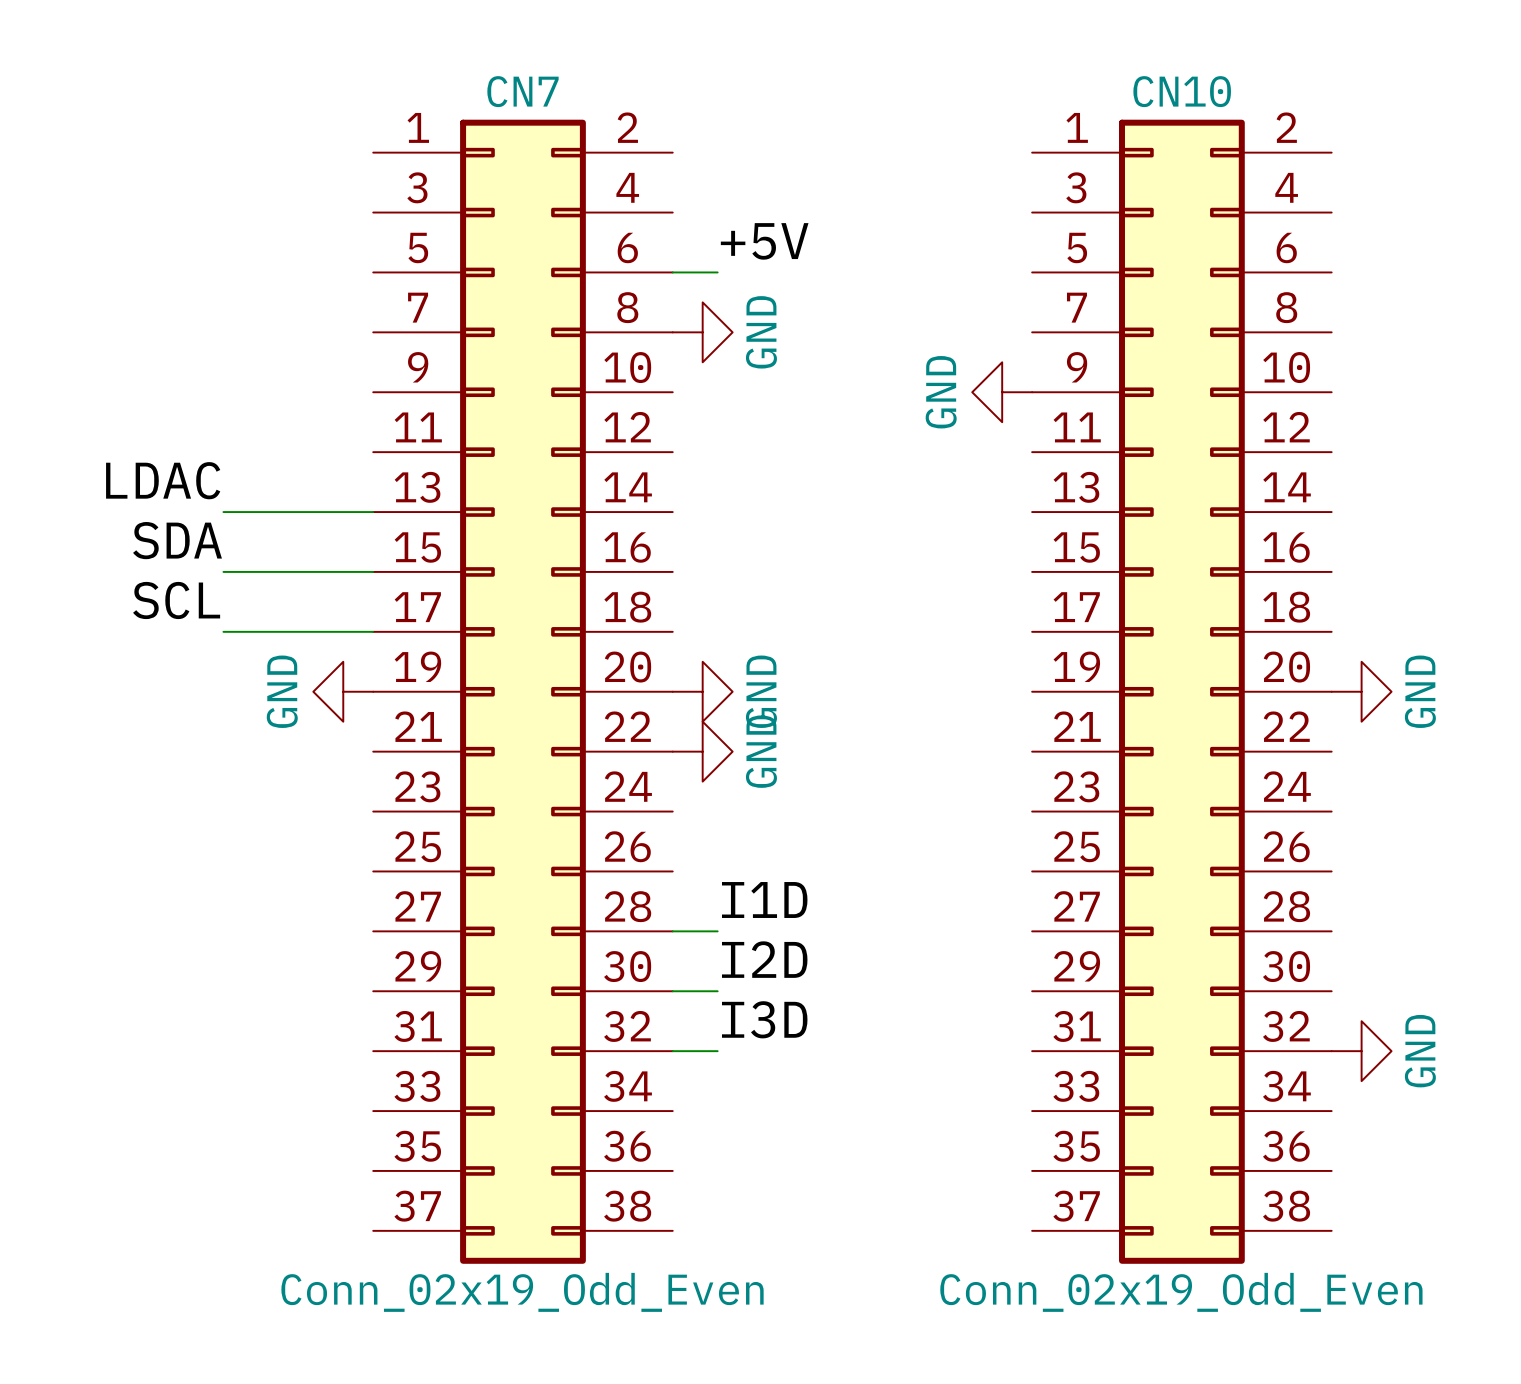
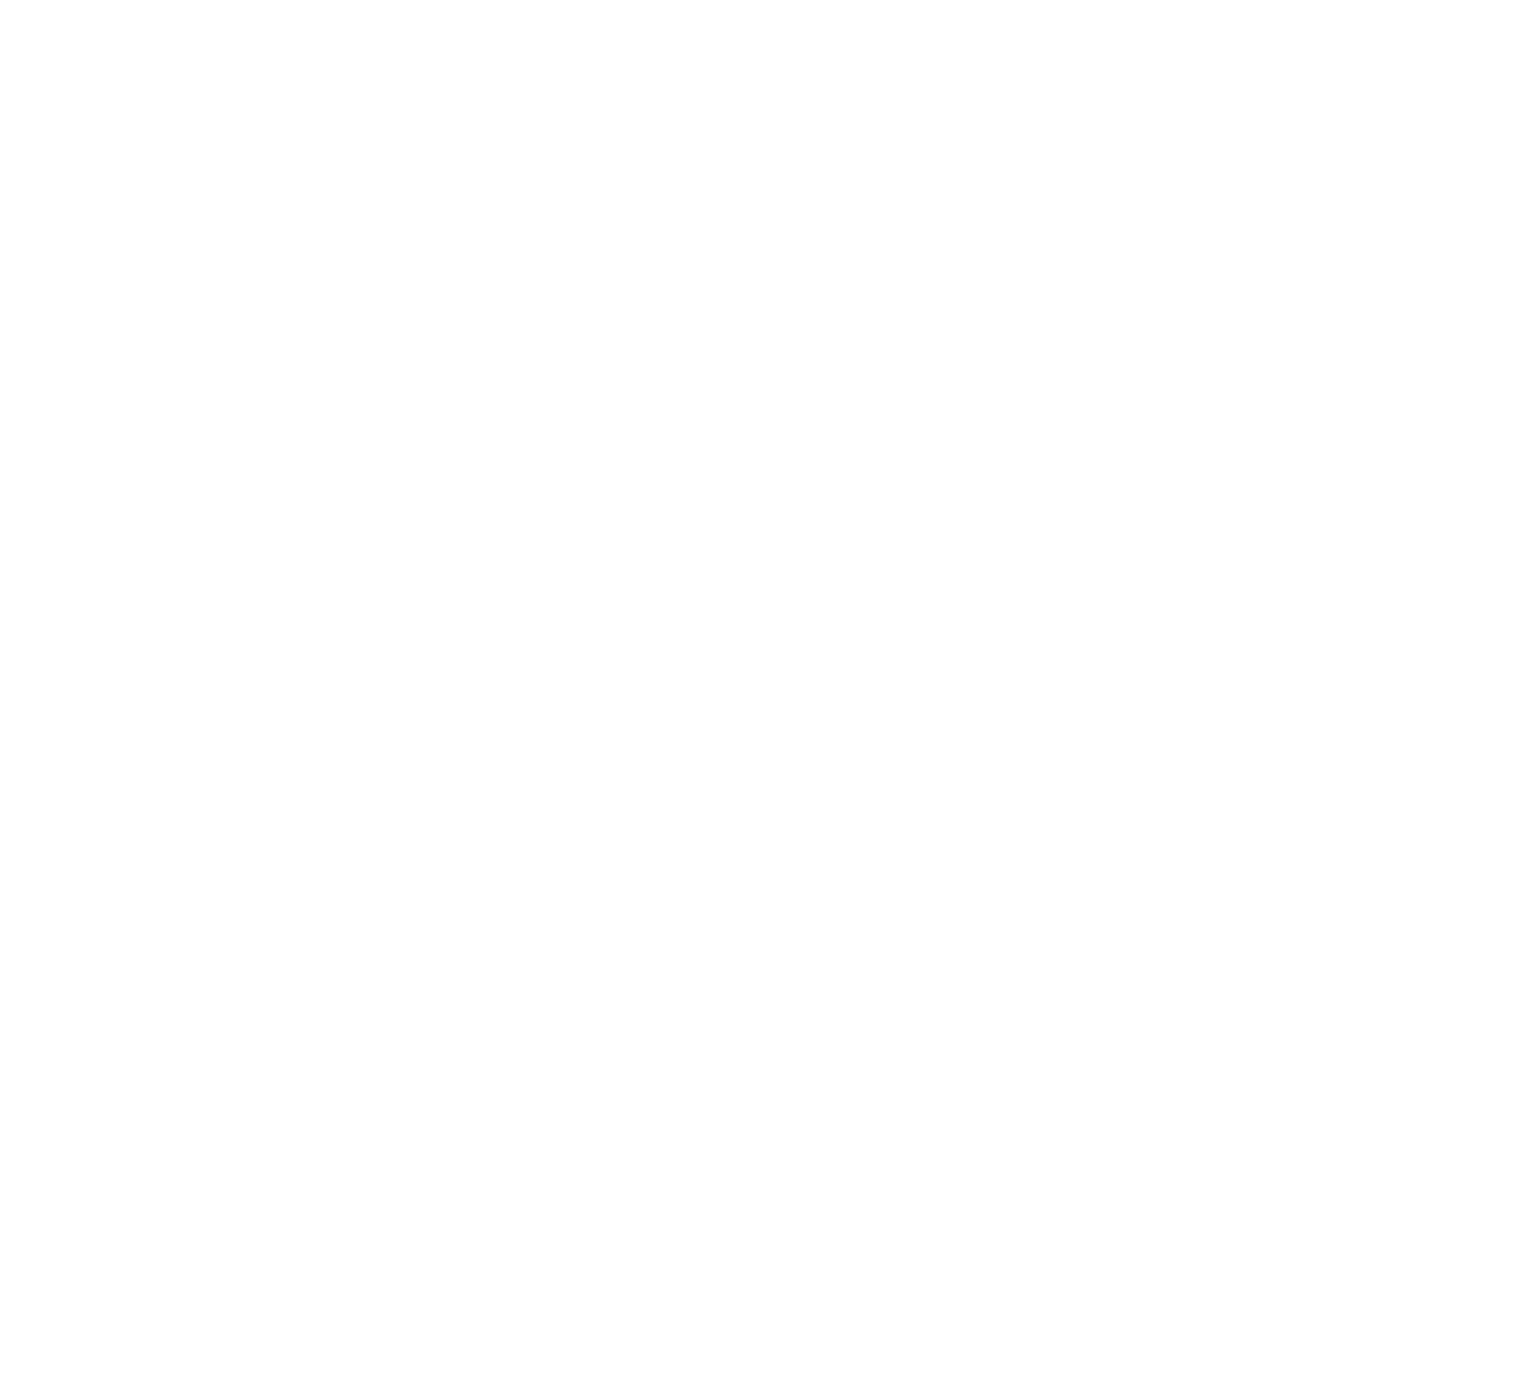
label: +5V (764, 241) -> none
wire: (672, 272) (717, 272) -> none
power symbol: GND (702, 332) -> none
power symbol: GND (1002, 392) -> none
label: LDAC (163, 480) -> none
wire: (223, 512) (373, 512) -> none
label: SDA (177, 540) -> none
wire: (223, 571) (373, 571) -> none
label: SCL (176, 600) -> none
wire: (223, 631) (373, 631) -> none
power symbol: GND (343, 691) -> none
CN7: Conn_02x19_Odd_Even (522, 691) -> none
power symbol: GND (702, 691) -> none
CN10: Conn_02x19_Odd_Even (1181, 691) -> none
power symbol: GND (1361, 691) -> none
power symbol: GND (702, 751) -> none
label: I1D (764, 900) -> none
wire: (672, 931) (717, 931) -> none
label: I2D (764, 959) -> none
wire: (672, 991) (717, 991) -> none
label: I3D (764, 1019) -> none
wire: (672, 1051) (717, 1051) -> none
power symbol: GND (1361, 1051) -> none

